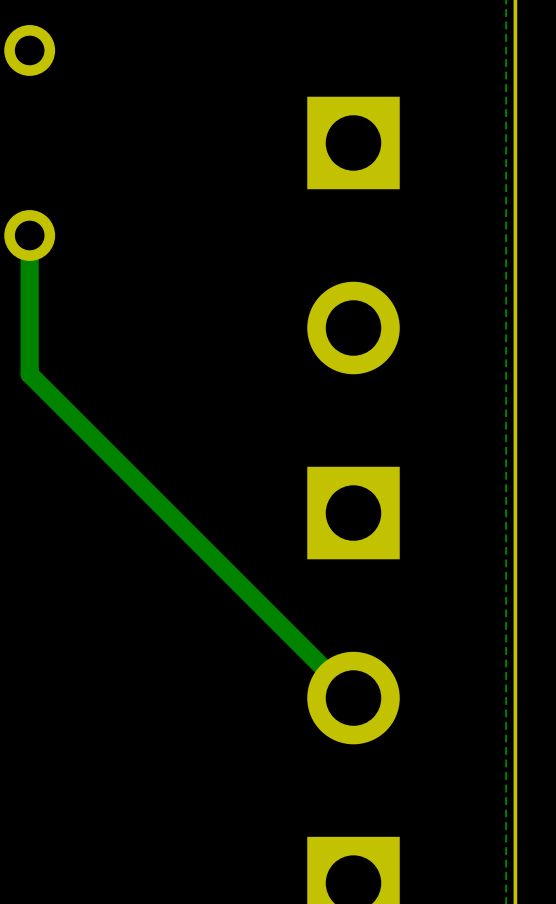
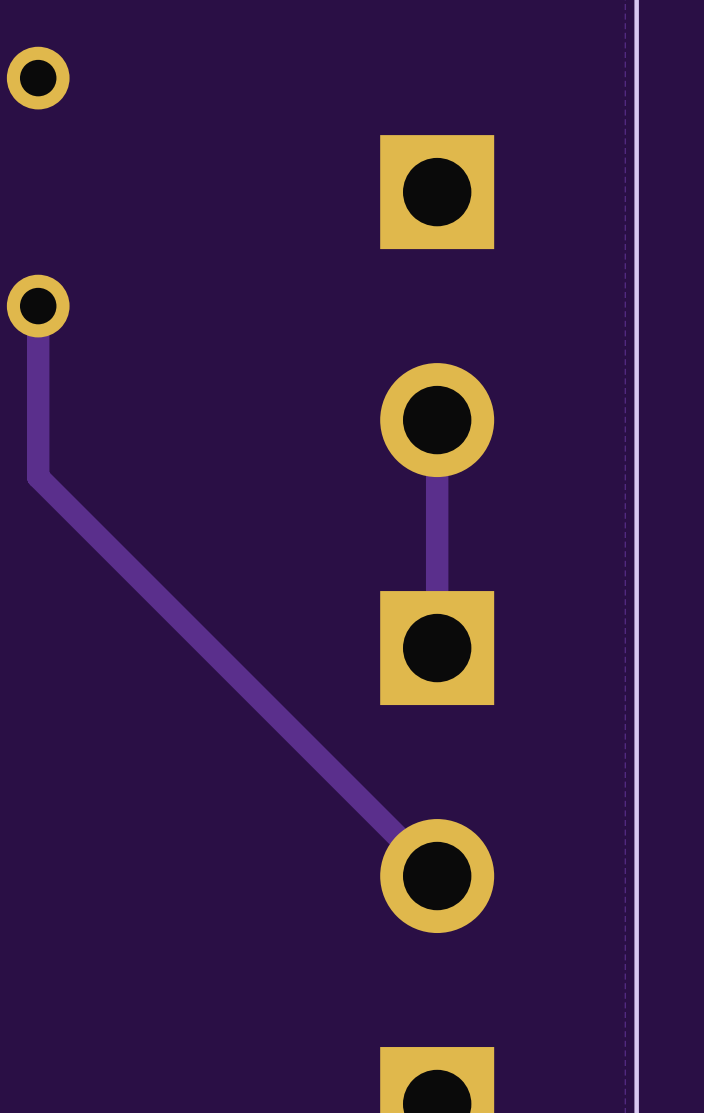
track: none -> (437, 420) (437, 648)

